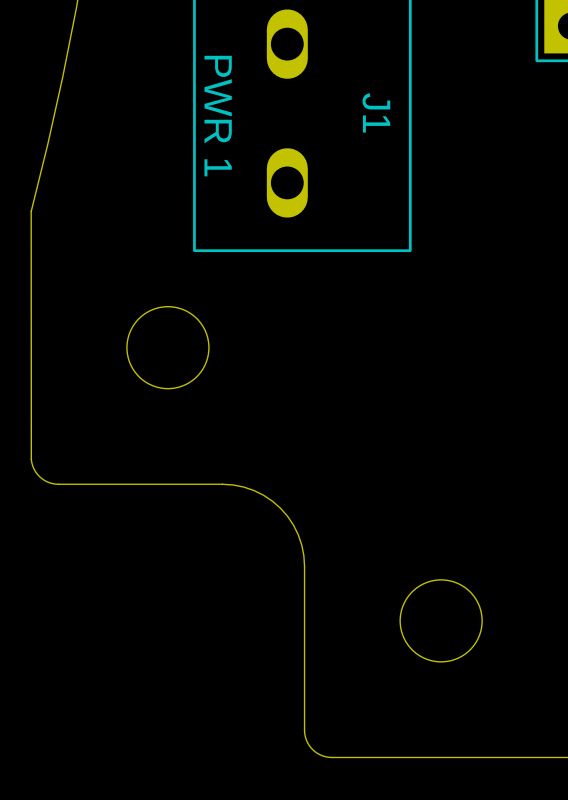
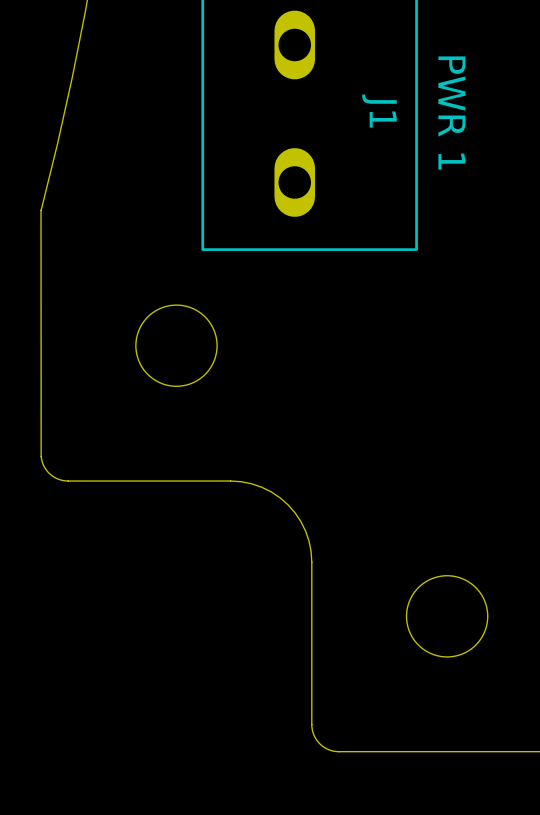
J1 value position: PWR 1 (218, 116) -> PWR 1 (451, 113)

